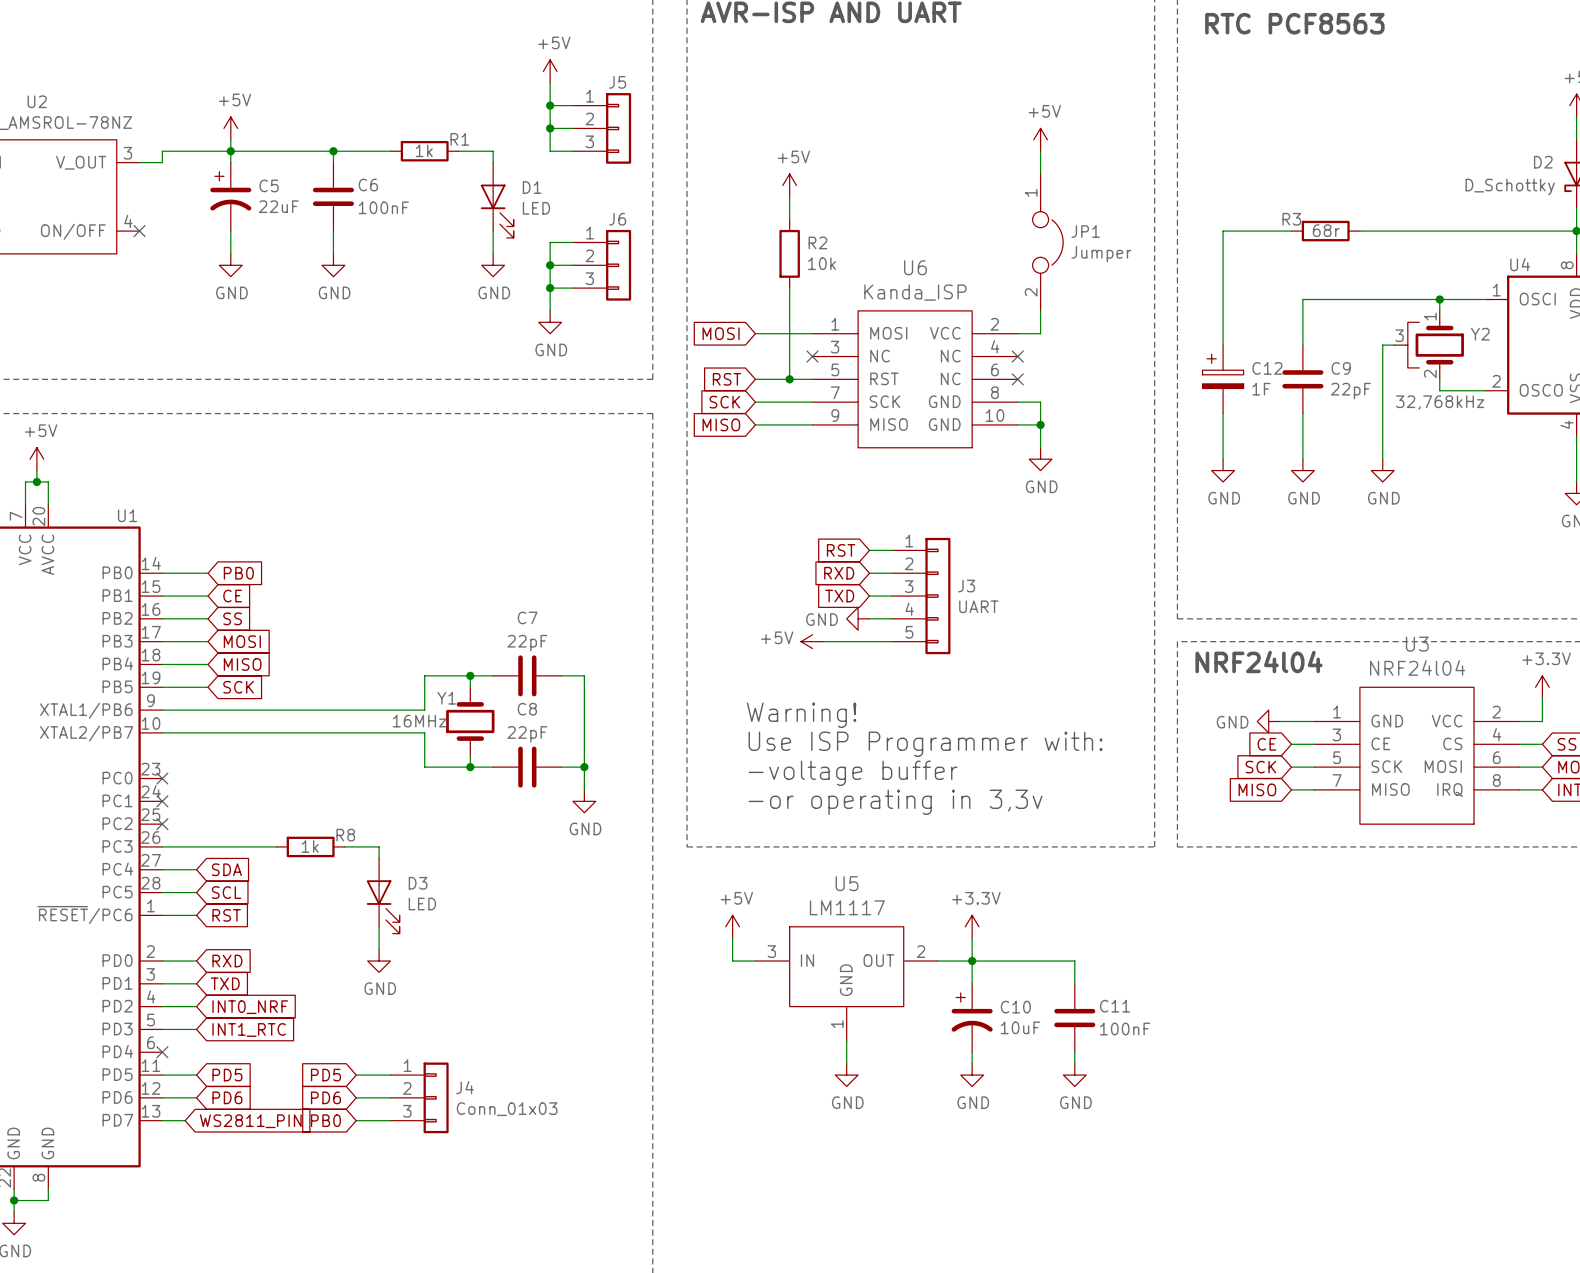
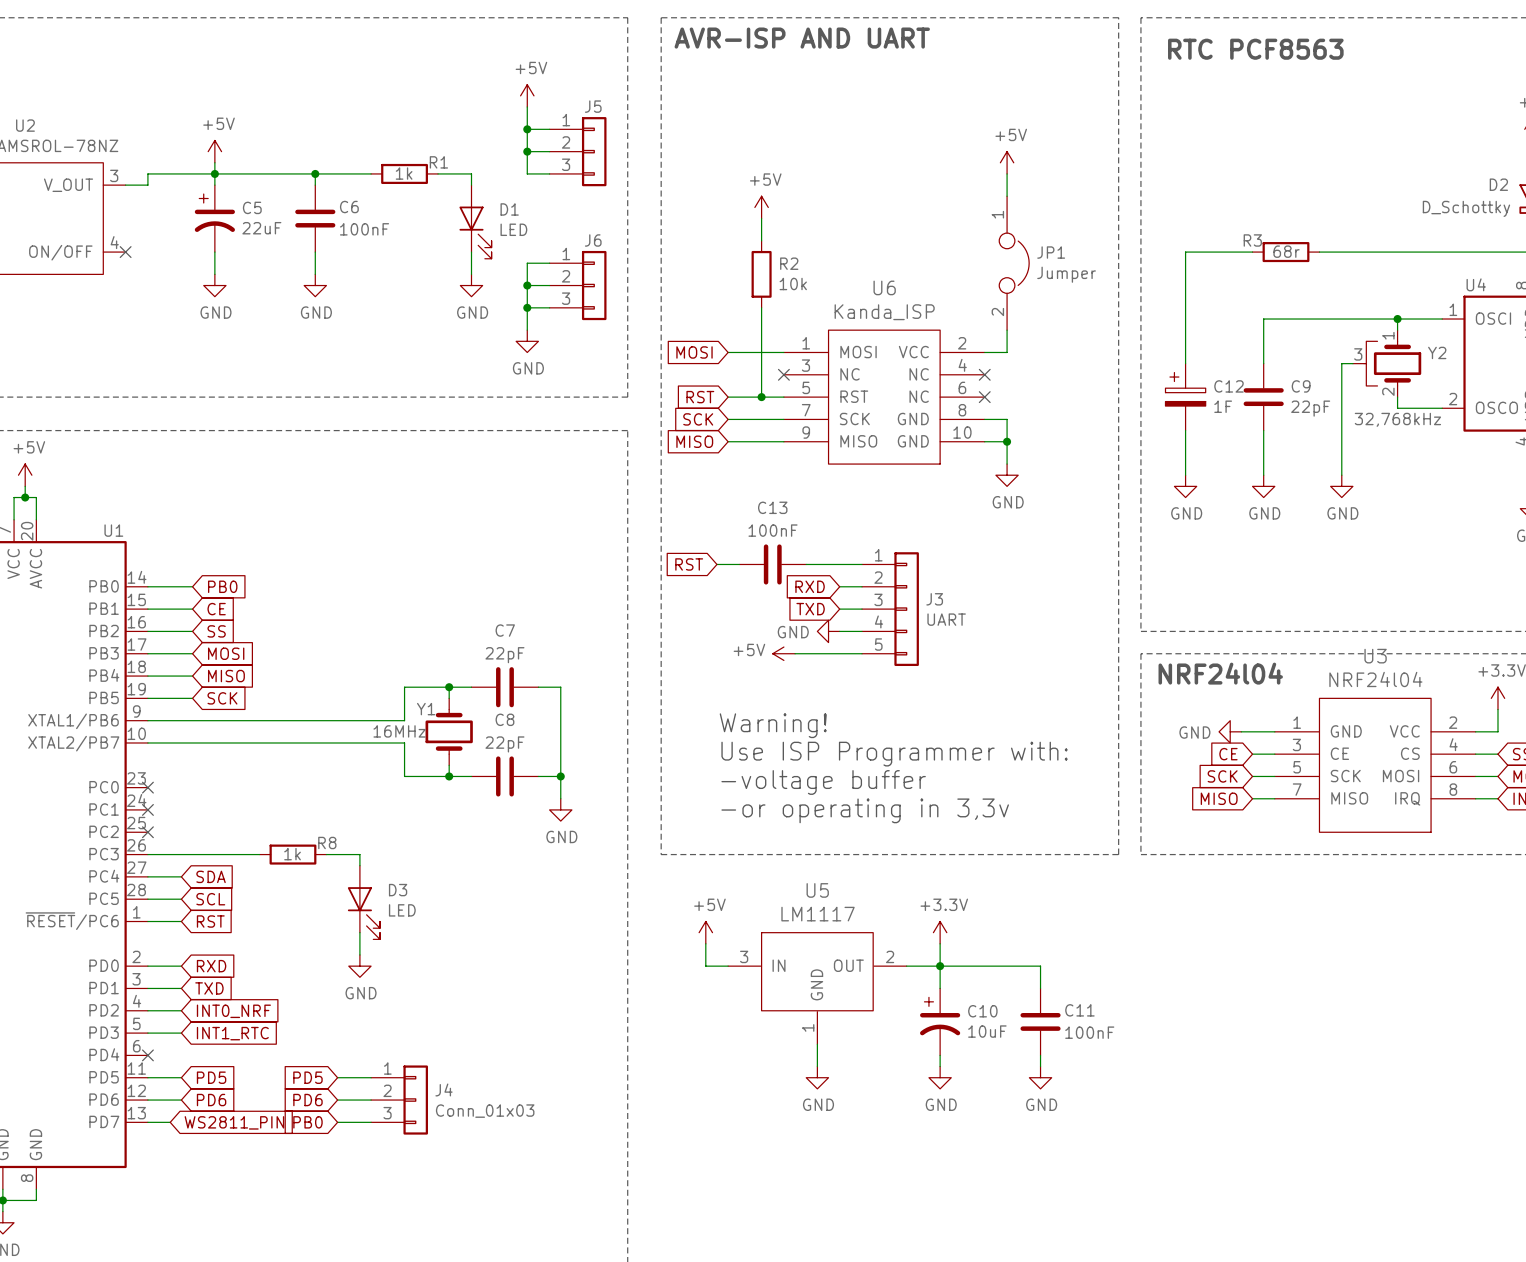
wire: none -> (716, 564) (739, 564)
C13: none -> 100nF (772, 564)
wire: none -> (806, 564) (839, 564)
global label position: RST (841, 550) -> RST (689, 564)

